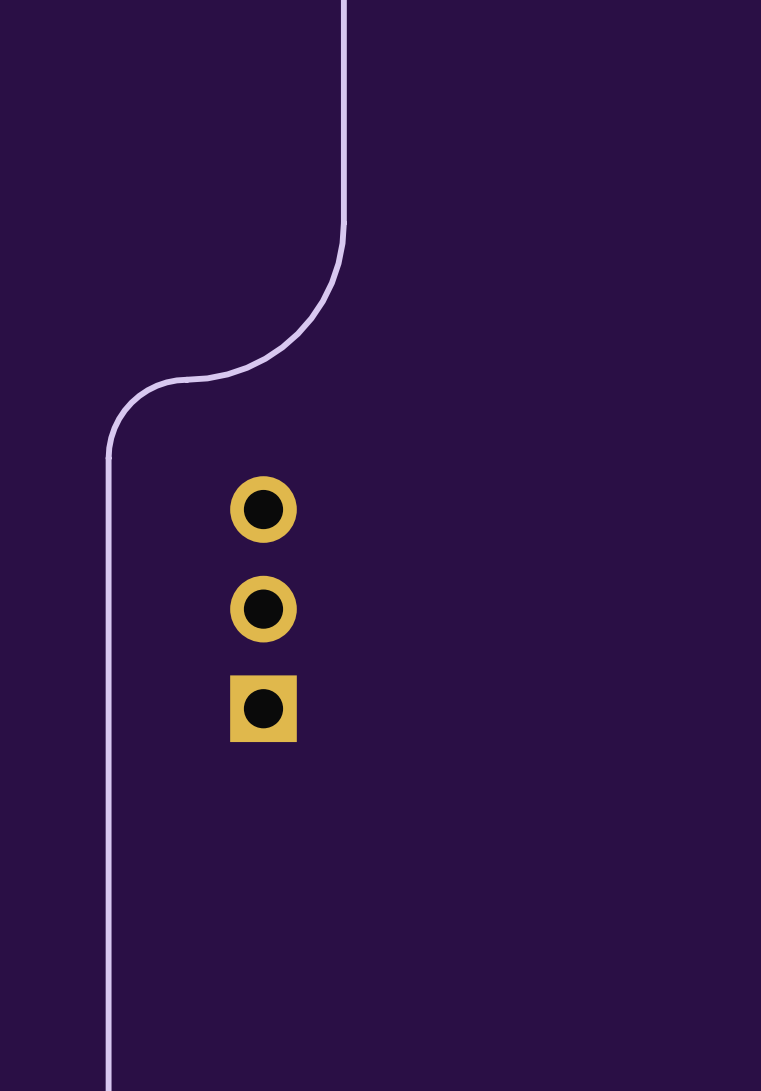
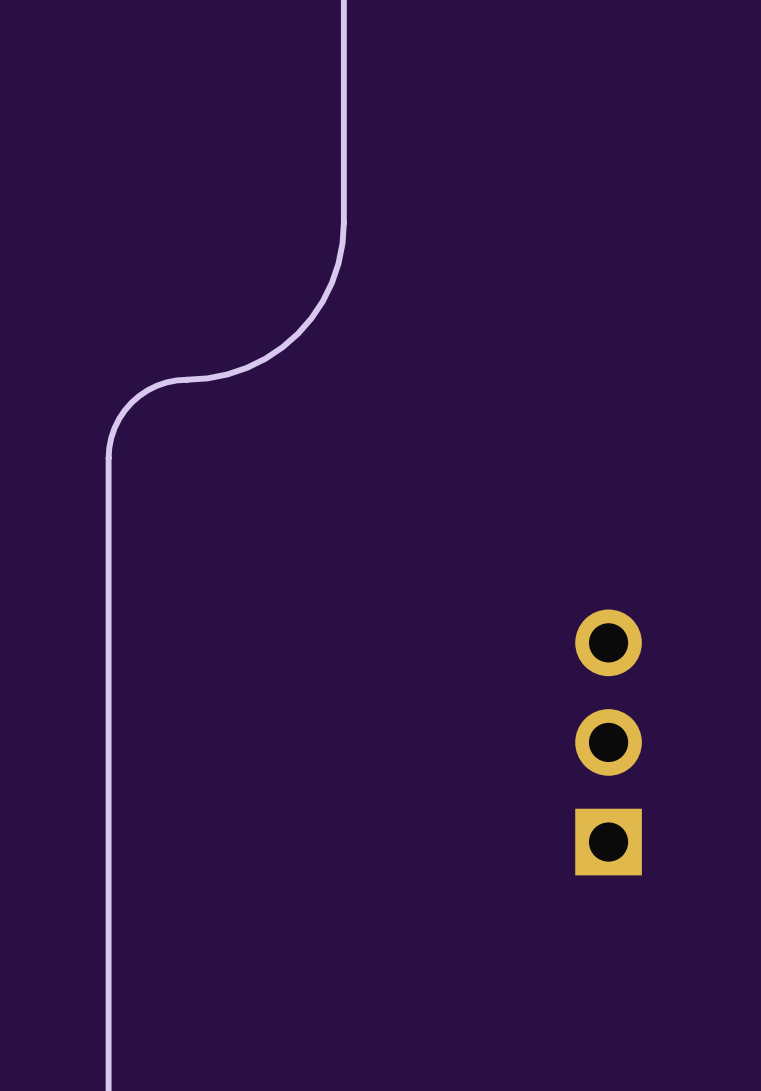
part position: (263, 609) -> (608, 742)

